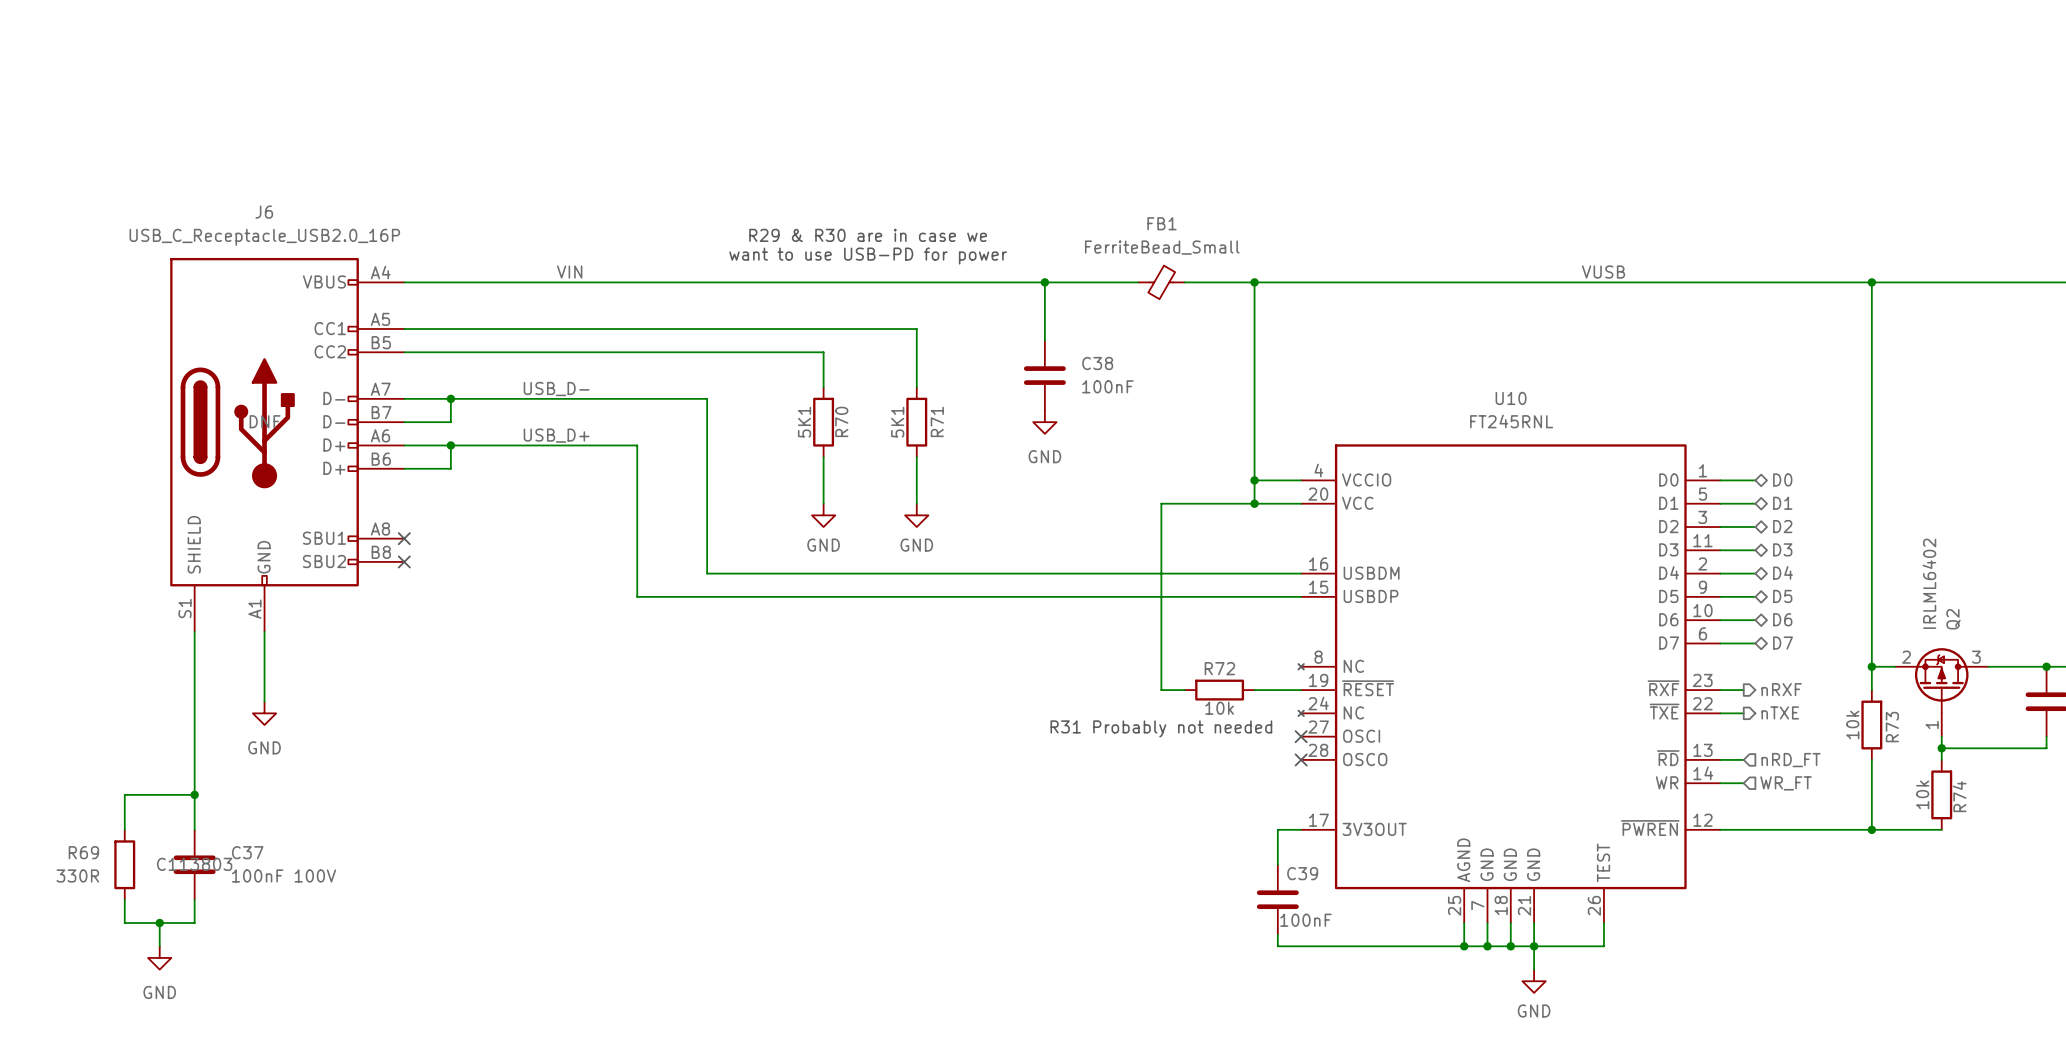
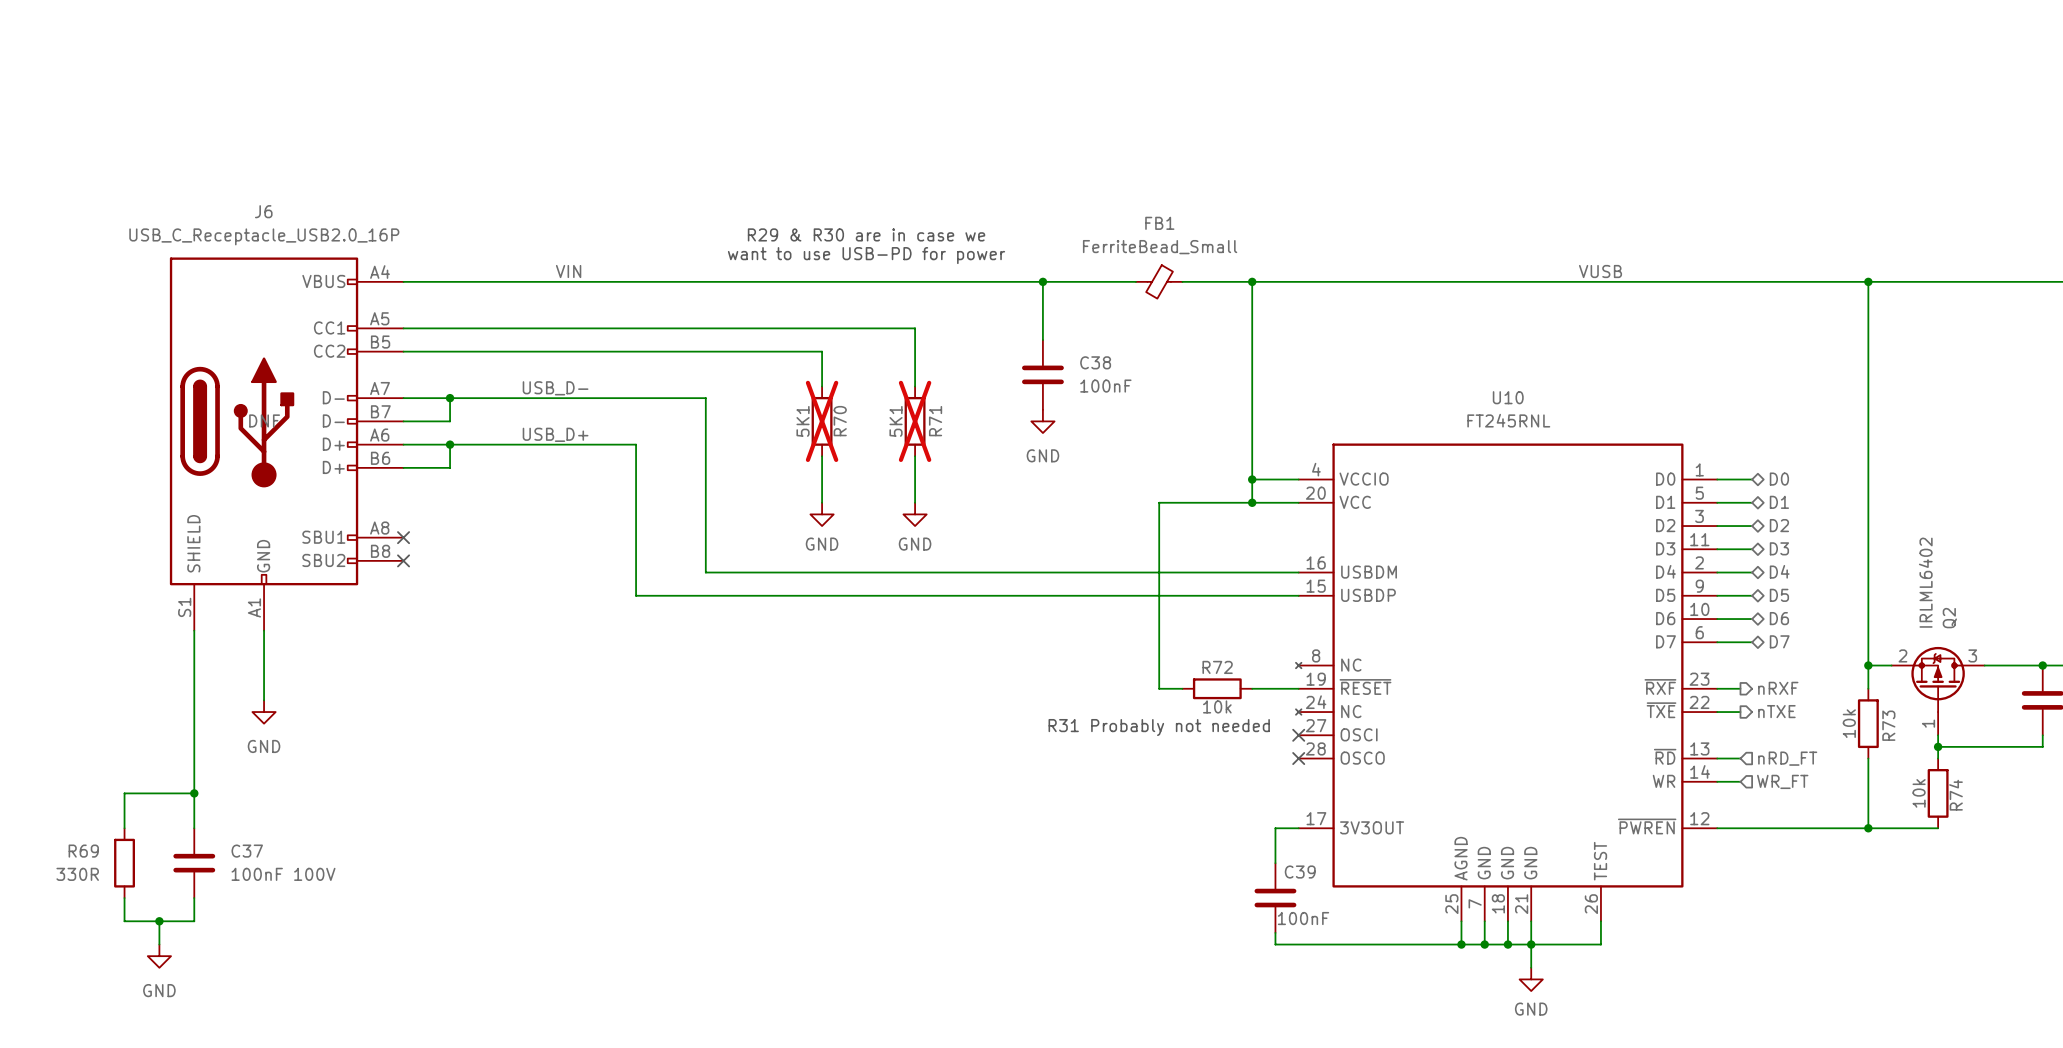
R70 do-not-place cross: none -> (822, 421)
R71 do-not-place cross: none -> (915, 421)
C37 text: C113803 (194, 864) -> none

